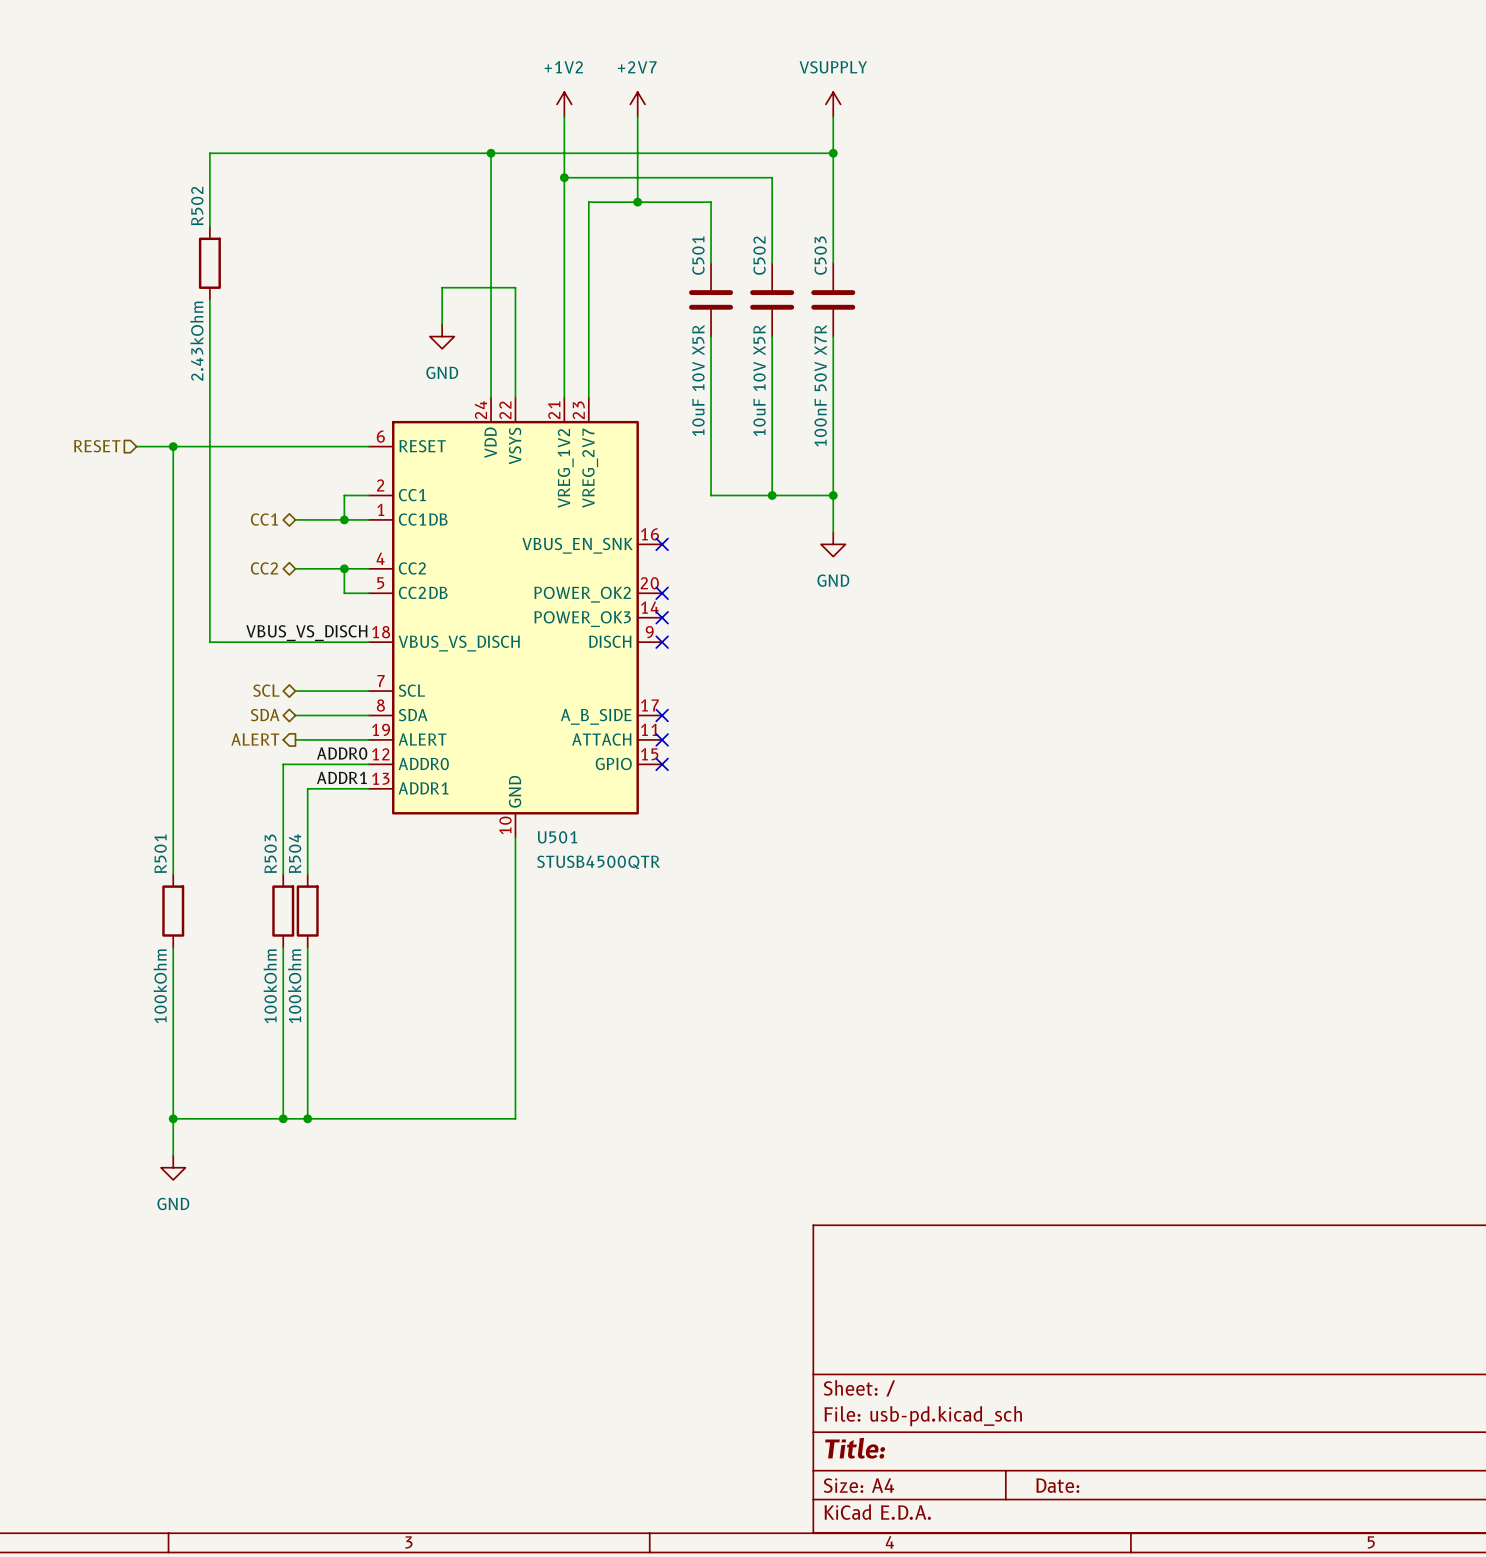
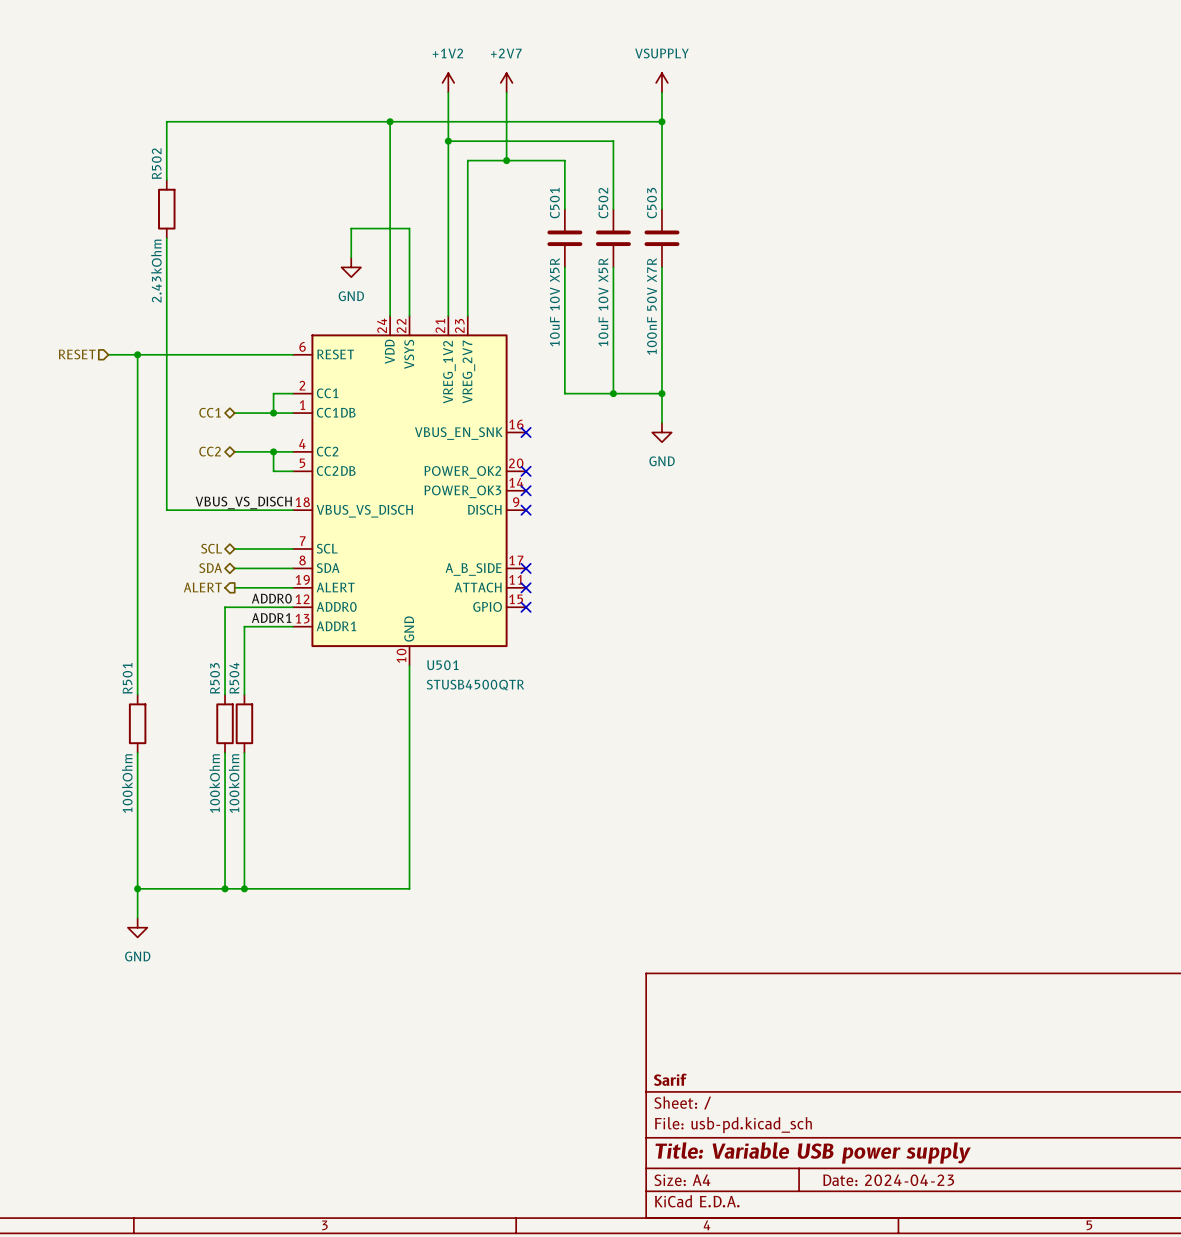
title block: none -> Sarif (670, 1079)
title block: Title: (855, 1448) -> Title: Variable USB power supply (813, 1152)
title block: Date: (1057, 1485) -> Date: 2024-04-23 (888, 1180)

